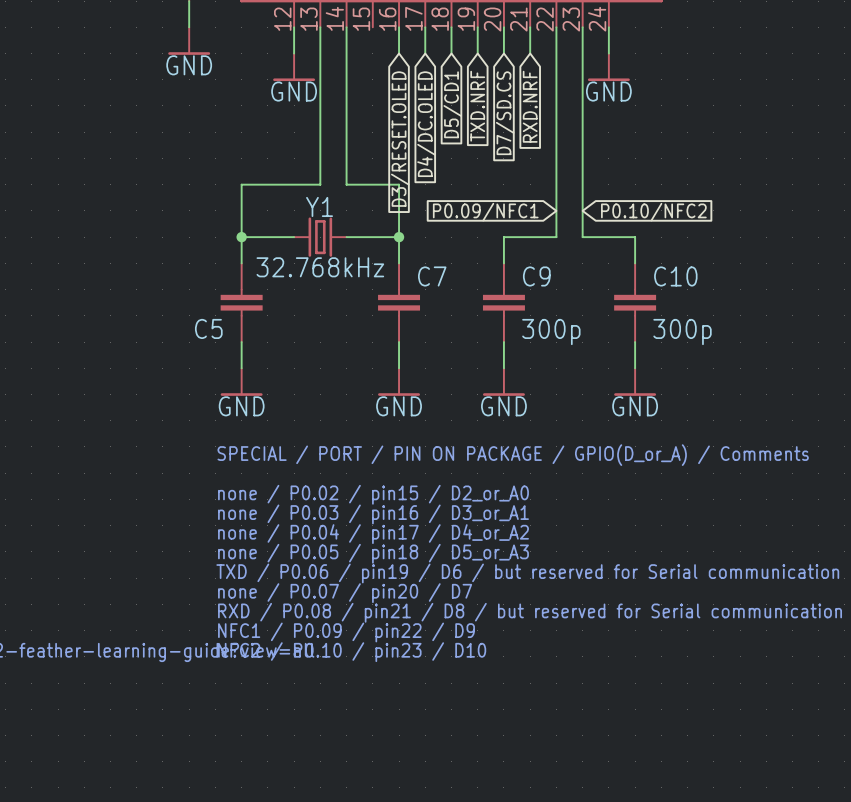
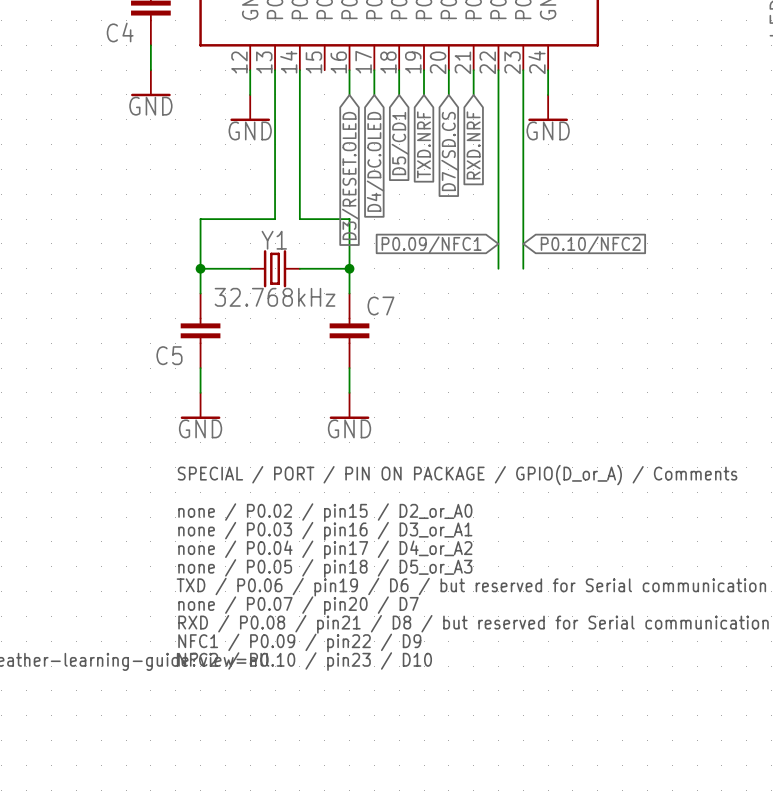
wire: (556, 237) (503, 237) (503, 263) -> none
wire: (582, 237) (635, 237) (635, 263) -> none
C9: 300p (503, 302) -> none
C10: 300p (635, 302) -> none
wire: (503, 342) (503, 368) -> none
wire: (635, 342) (635, 368) -> none
power symbol: GND (503, 382) -> none
power symbol: GND (635, 382) -> none

